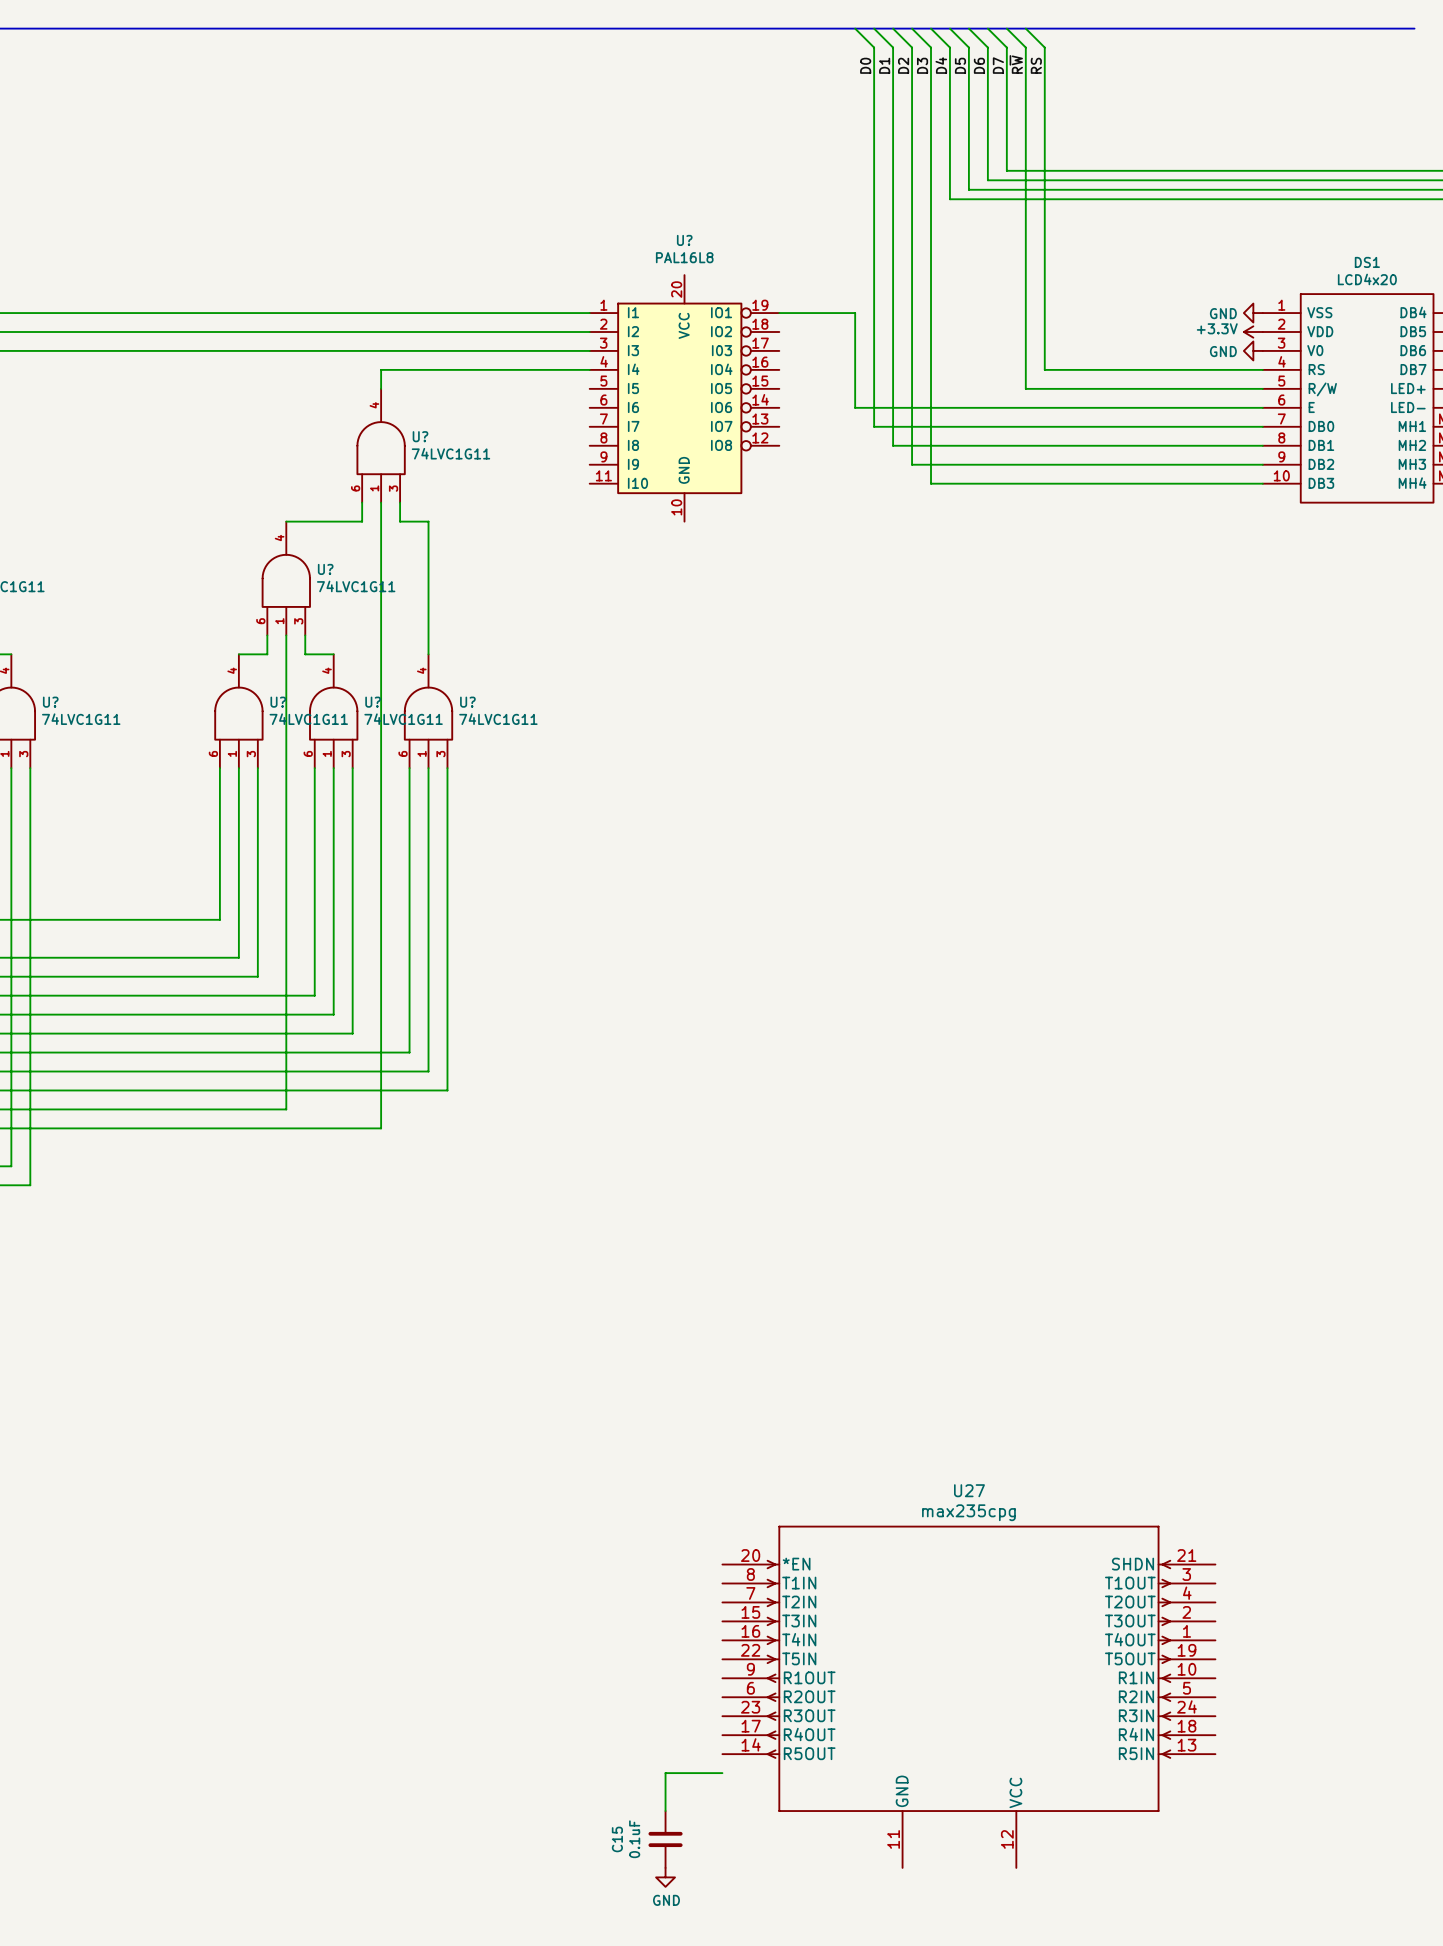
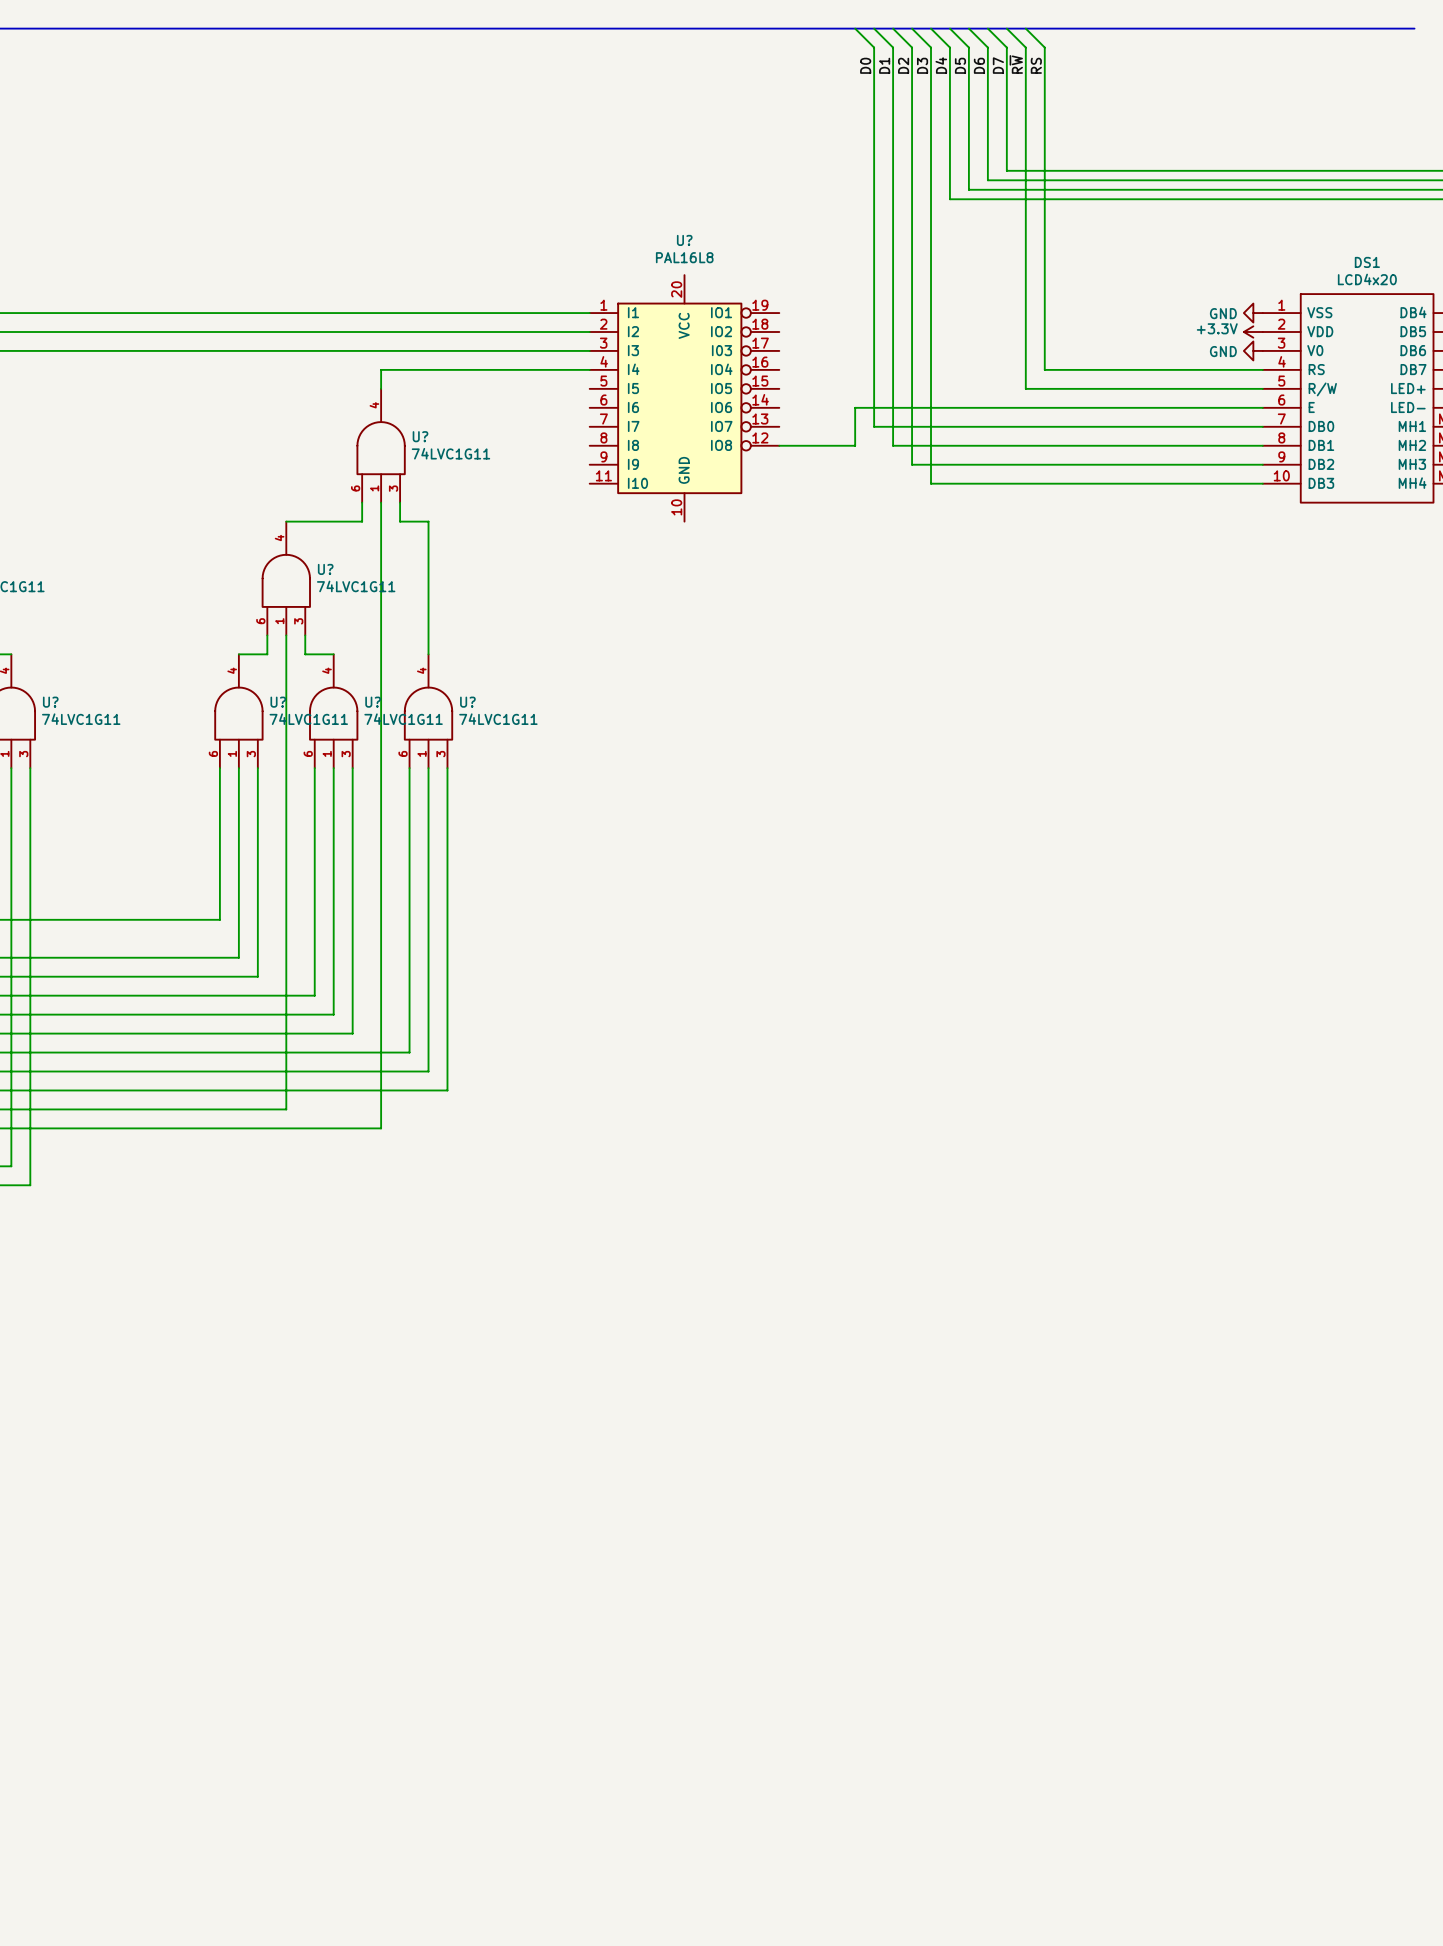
wire: (779, 313) (855, 313) (855, 407) -> (779, 445) (855, 445) (855, 407)
U27: max235cpg (968, 1697) -> none
wire: (722, 1773) (665, 1773) (665, 1811) -> none
C15: 0.1uF (665, 1839) -> none
power symbol: GND (665, 1877) -> none

